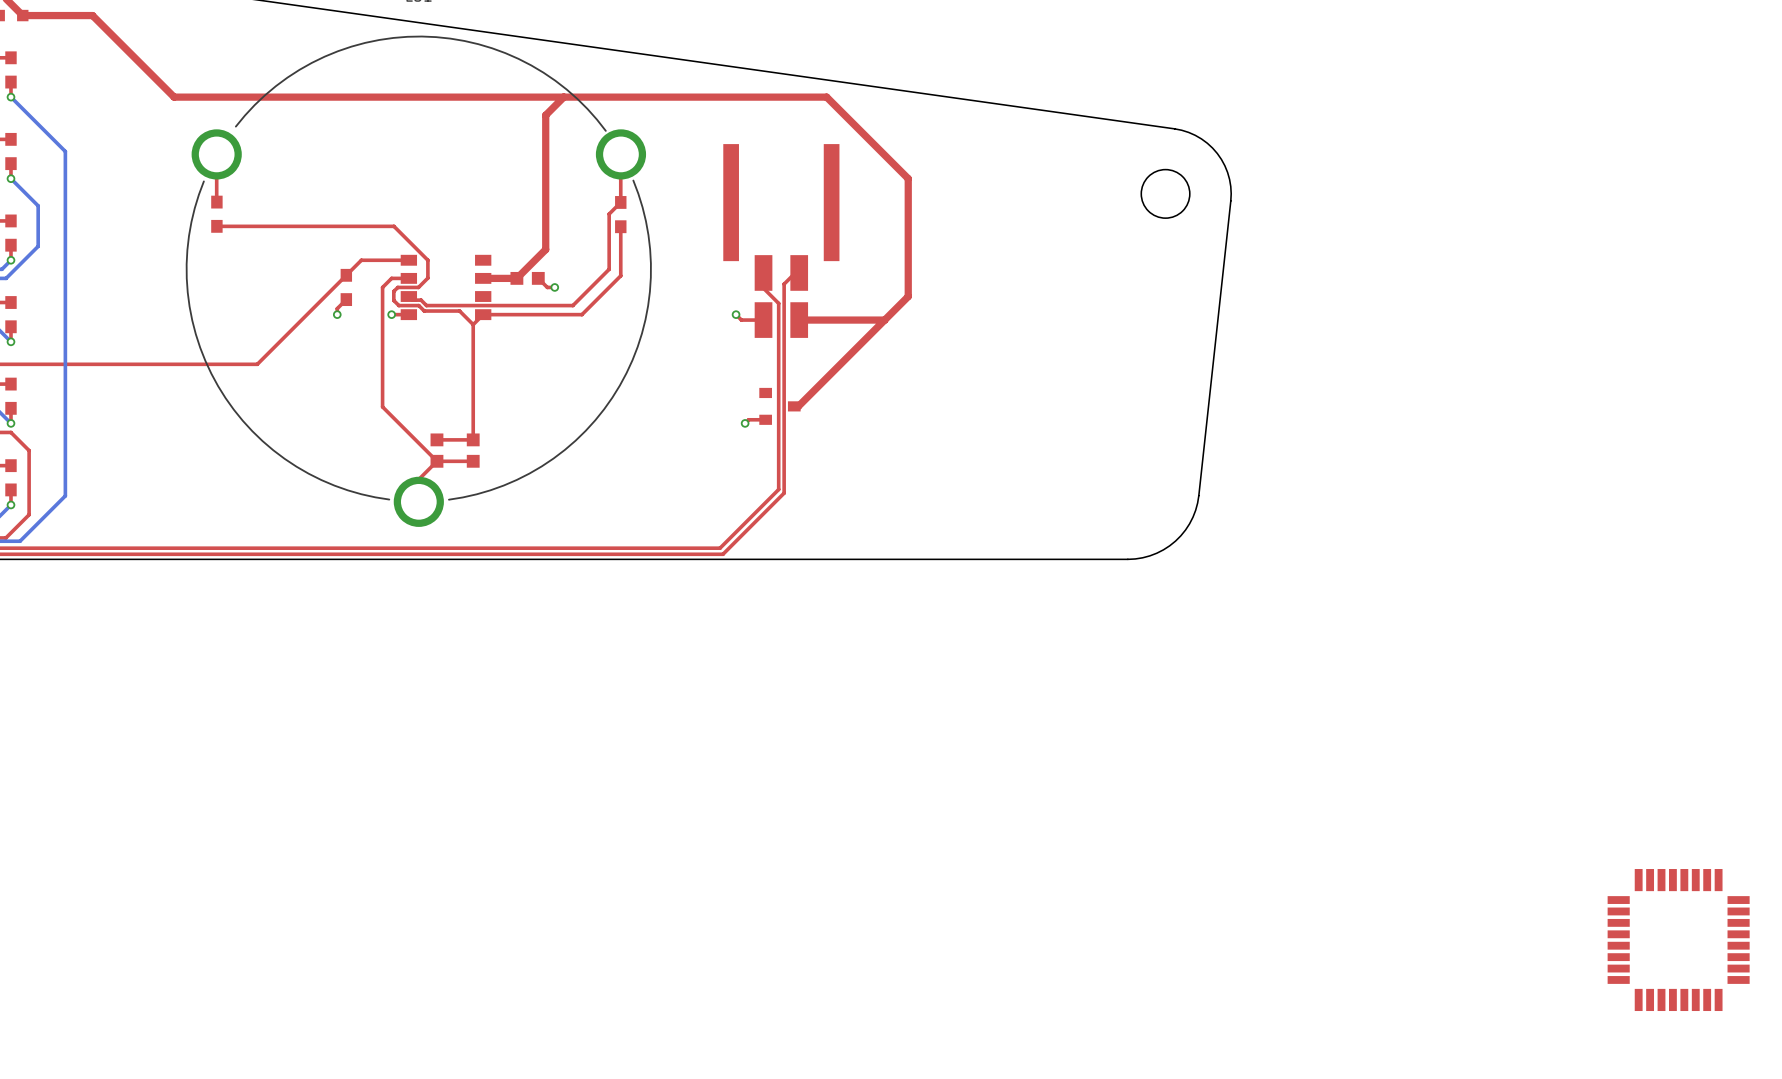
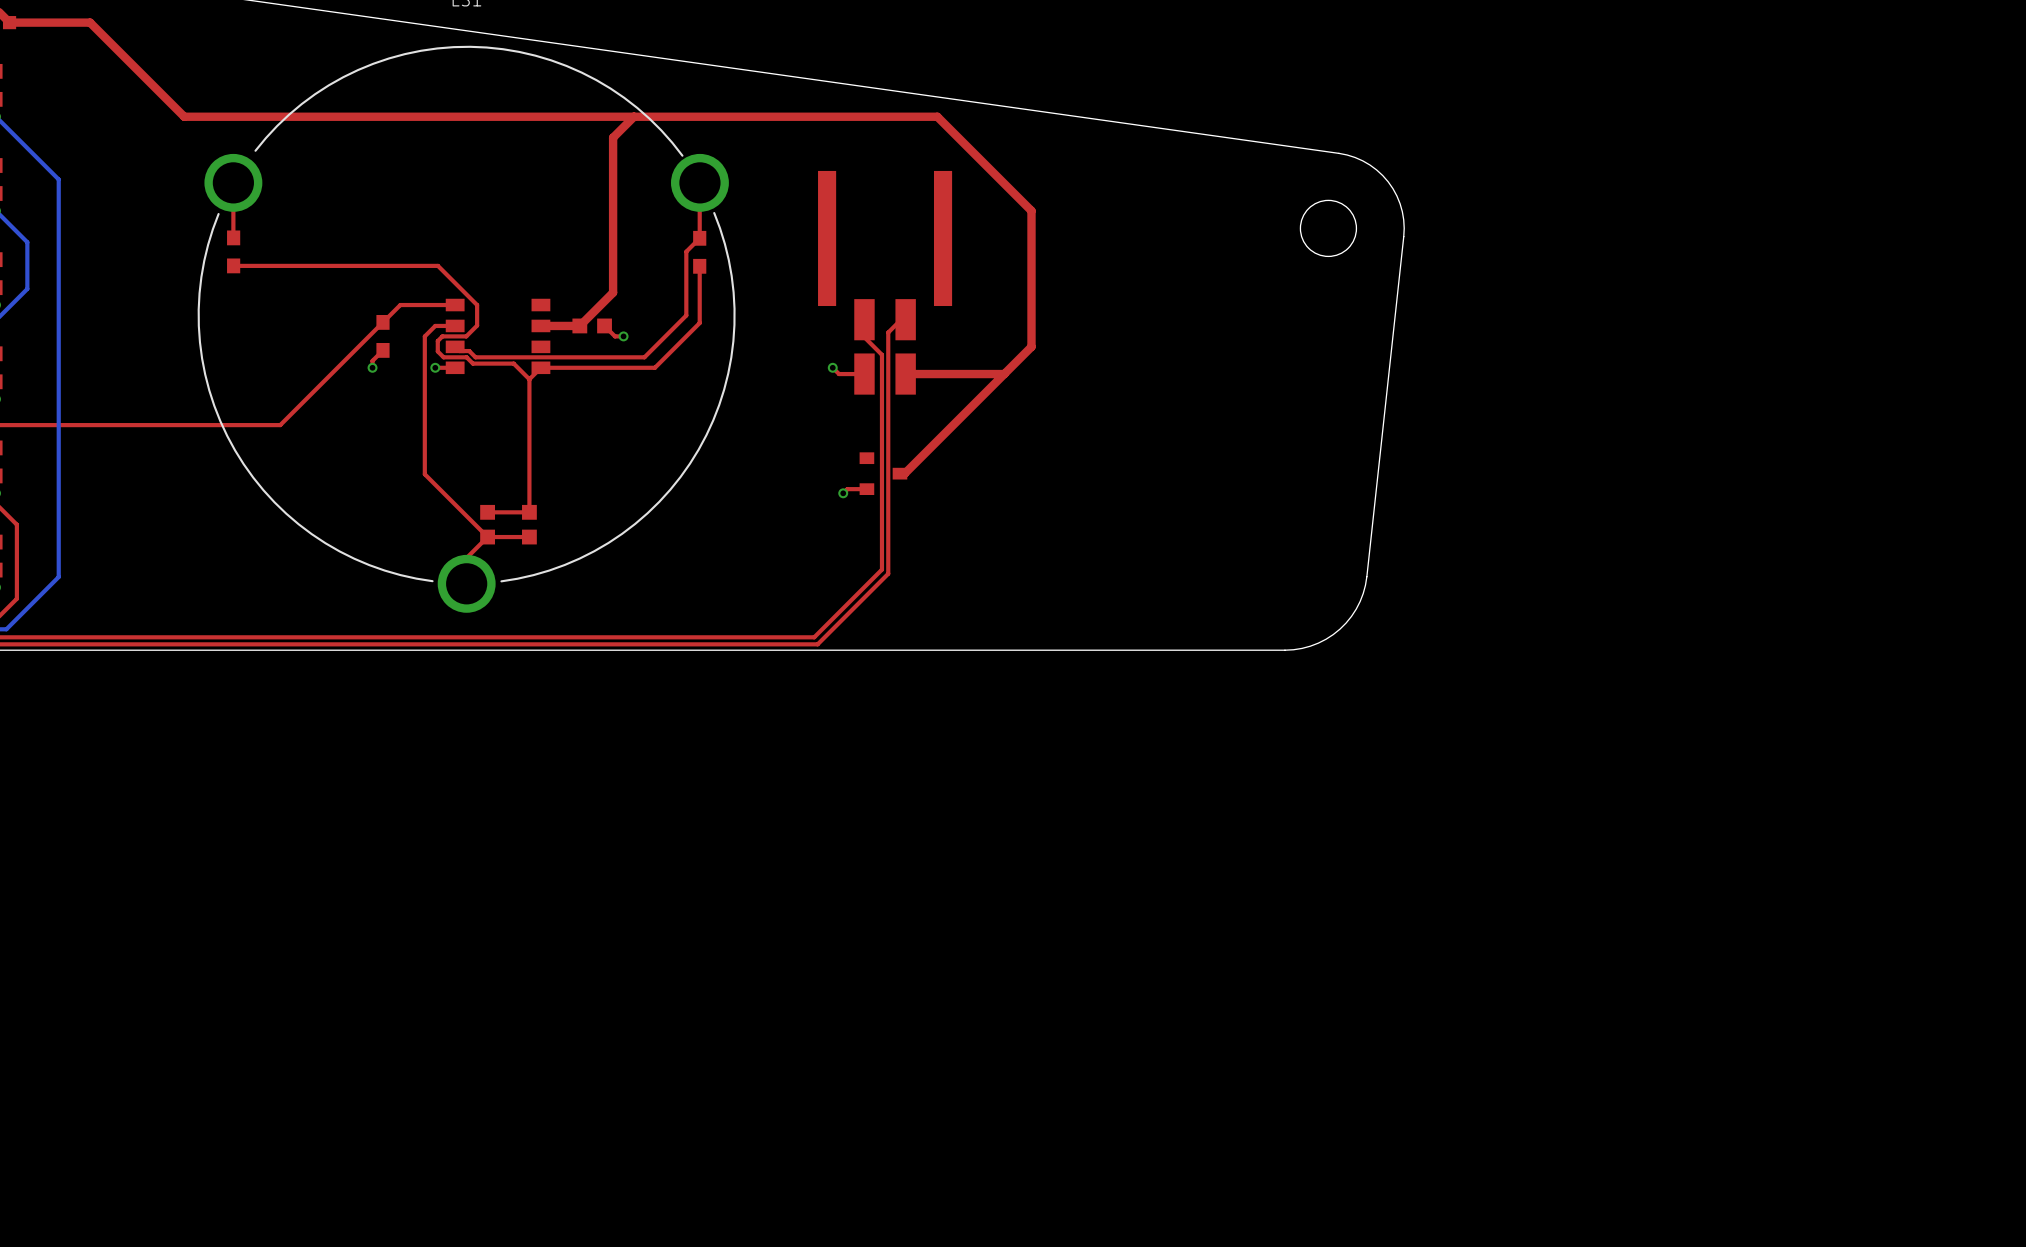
part: (1678, 940) -> none

